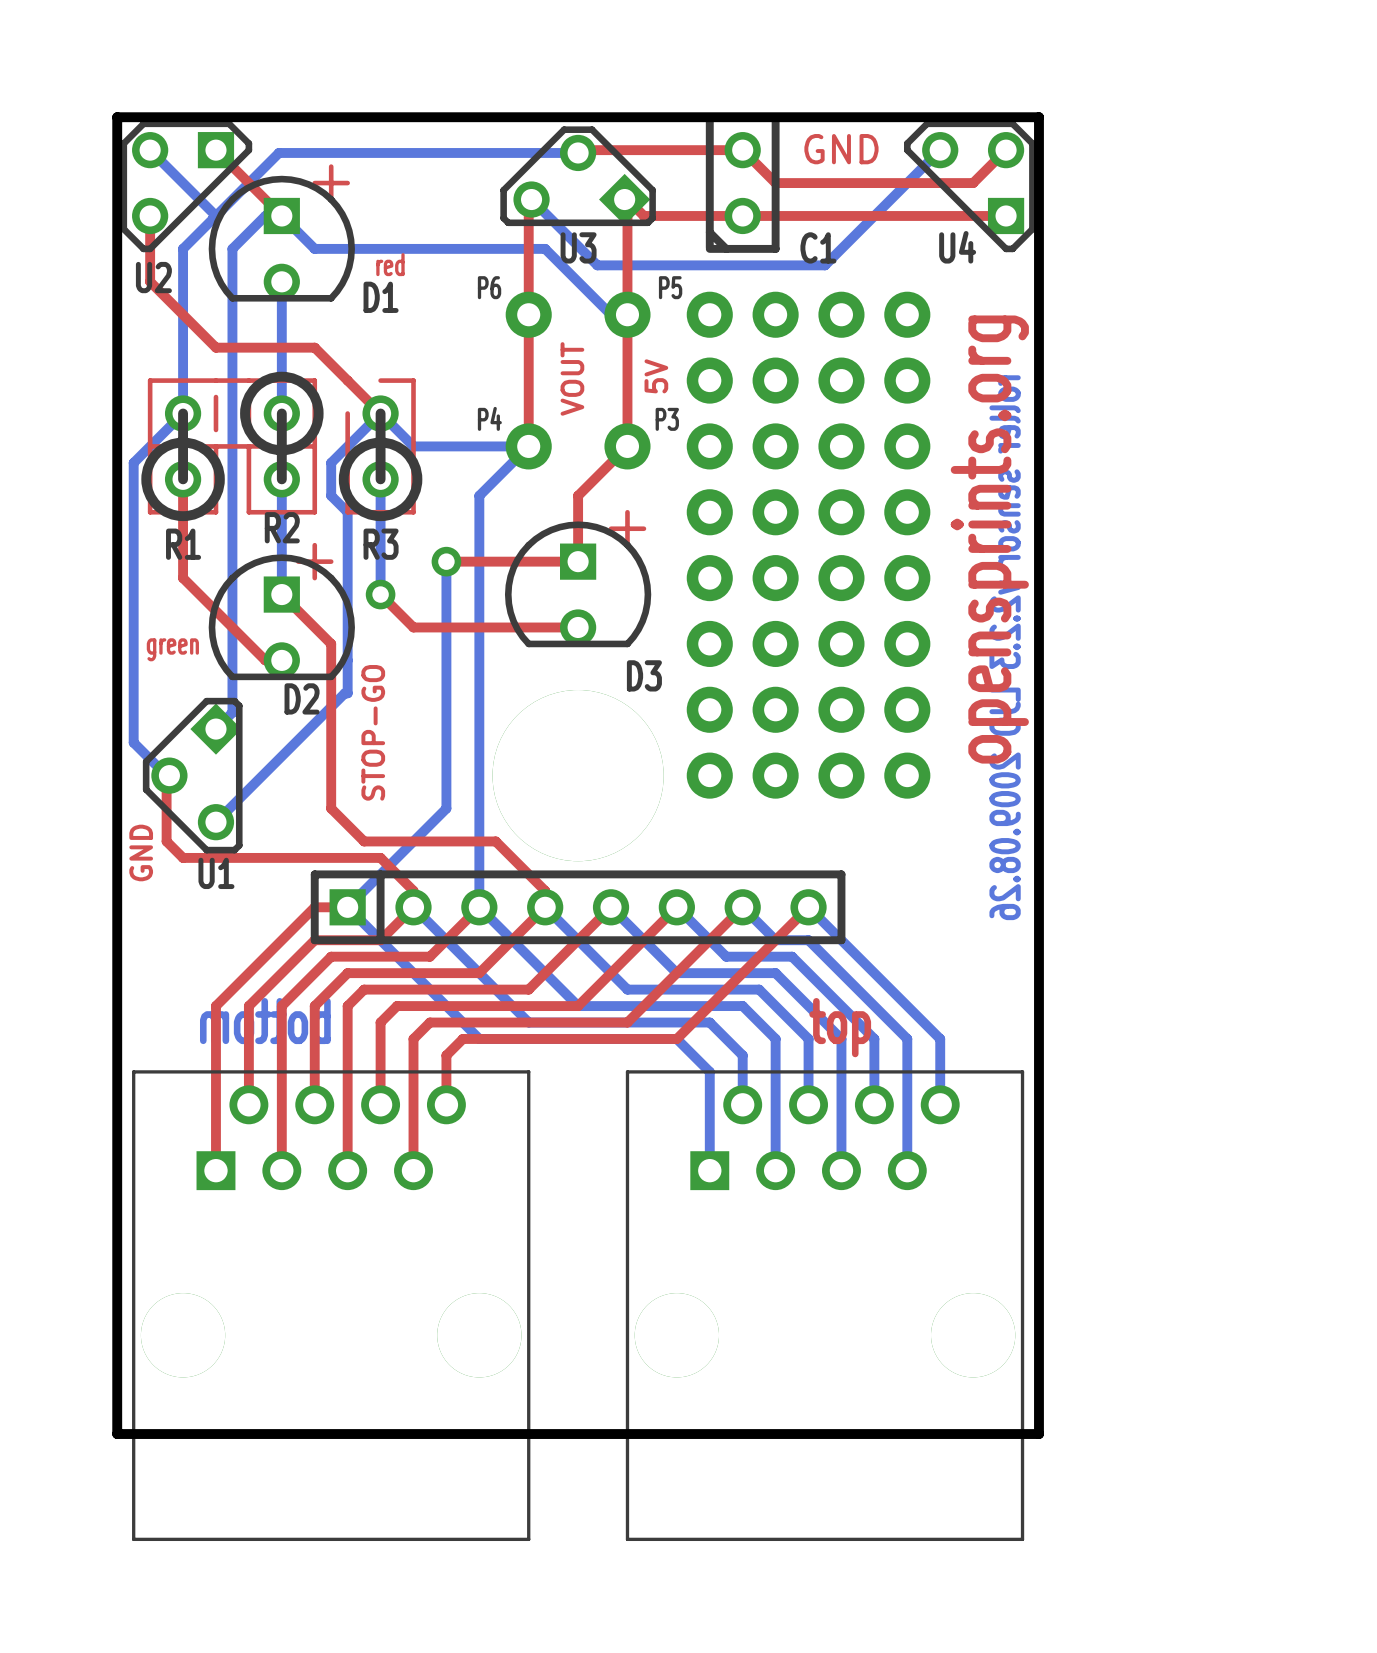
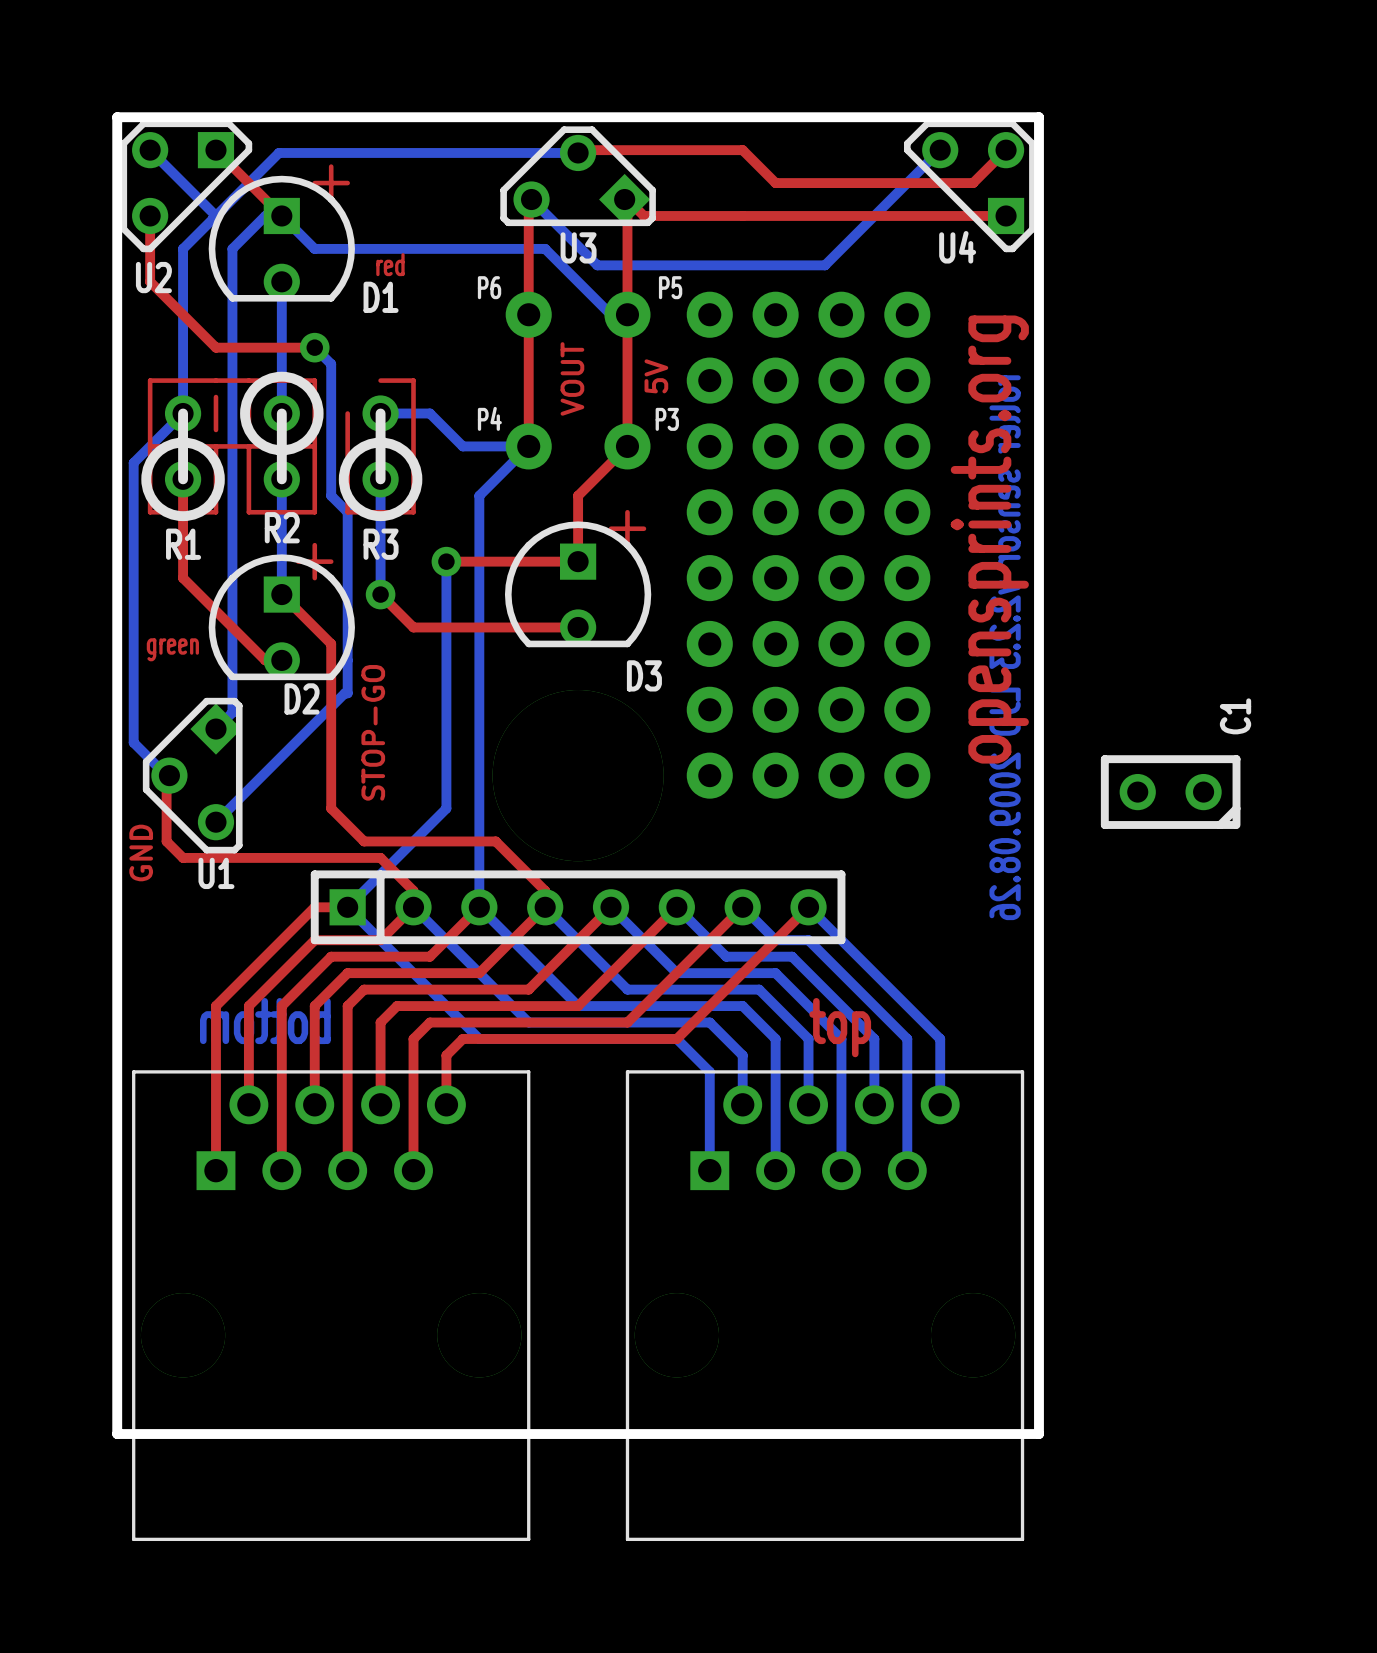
text: GND (841, 149) -> none
C1 rotation: 0° (742, 183) -> 90° counterclockwise (1170, 792)
C1 position: (742, 183) -> (1170, 792)
top track: (314, 347) (380, 413) -> none
bottom track: none -> (314, 347) (331, 364) (331, 462)
via: none -> (314, 347)
bottom track: (462, 446) (413, 446) (380, 413) (331, 462) -> (462, 446) (429, 413) (380, 413)

